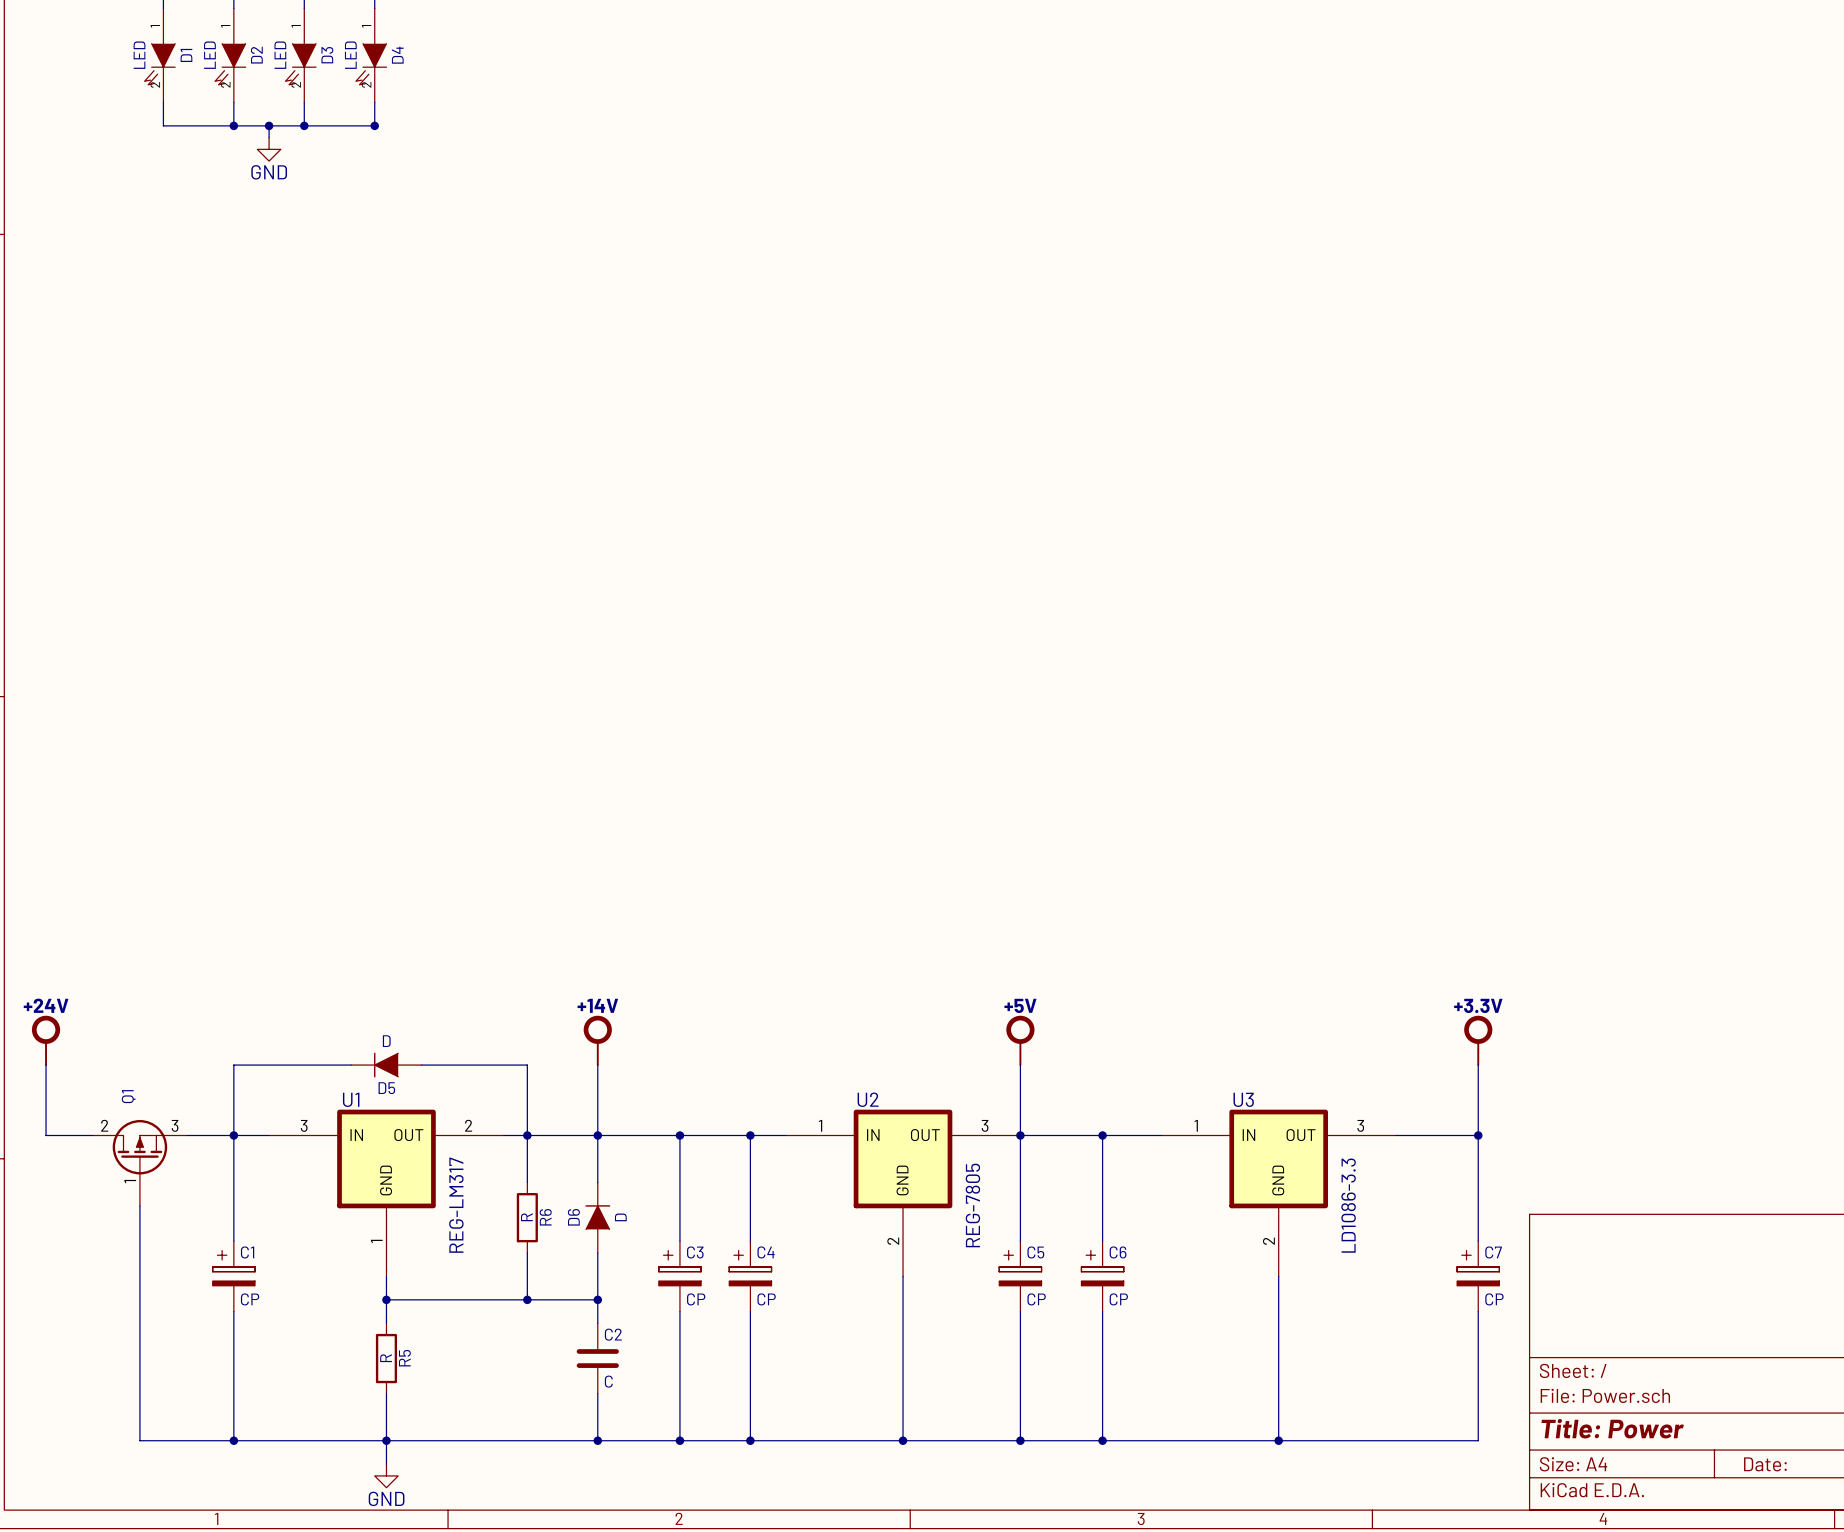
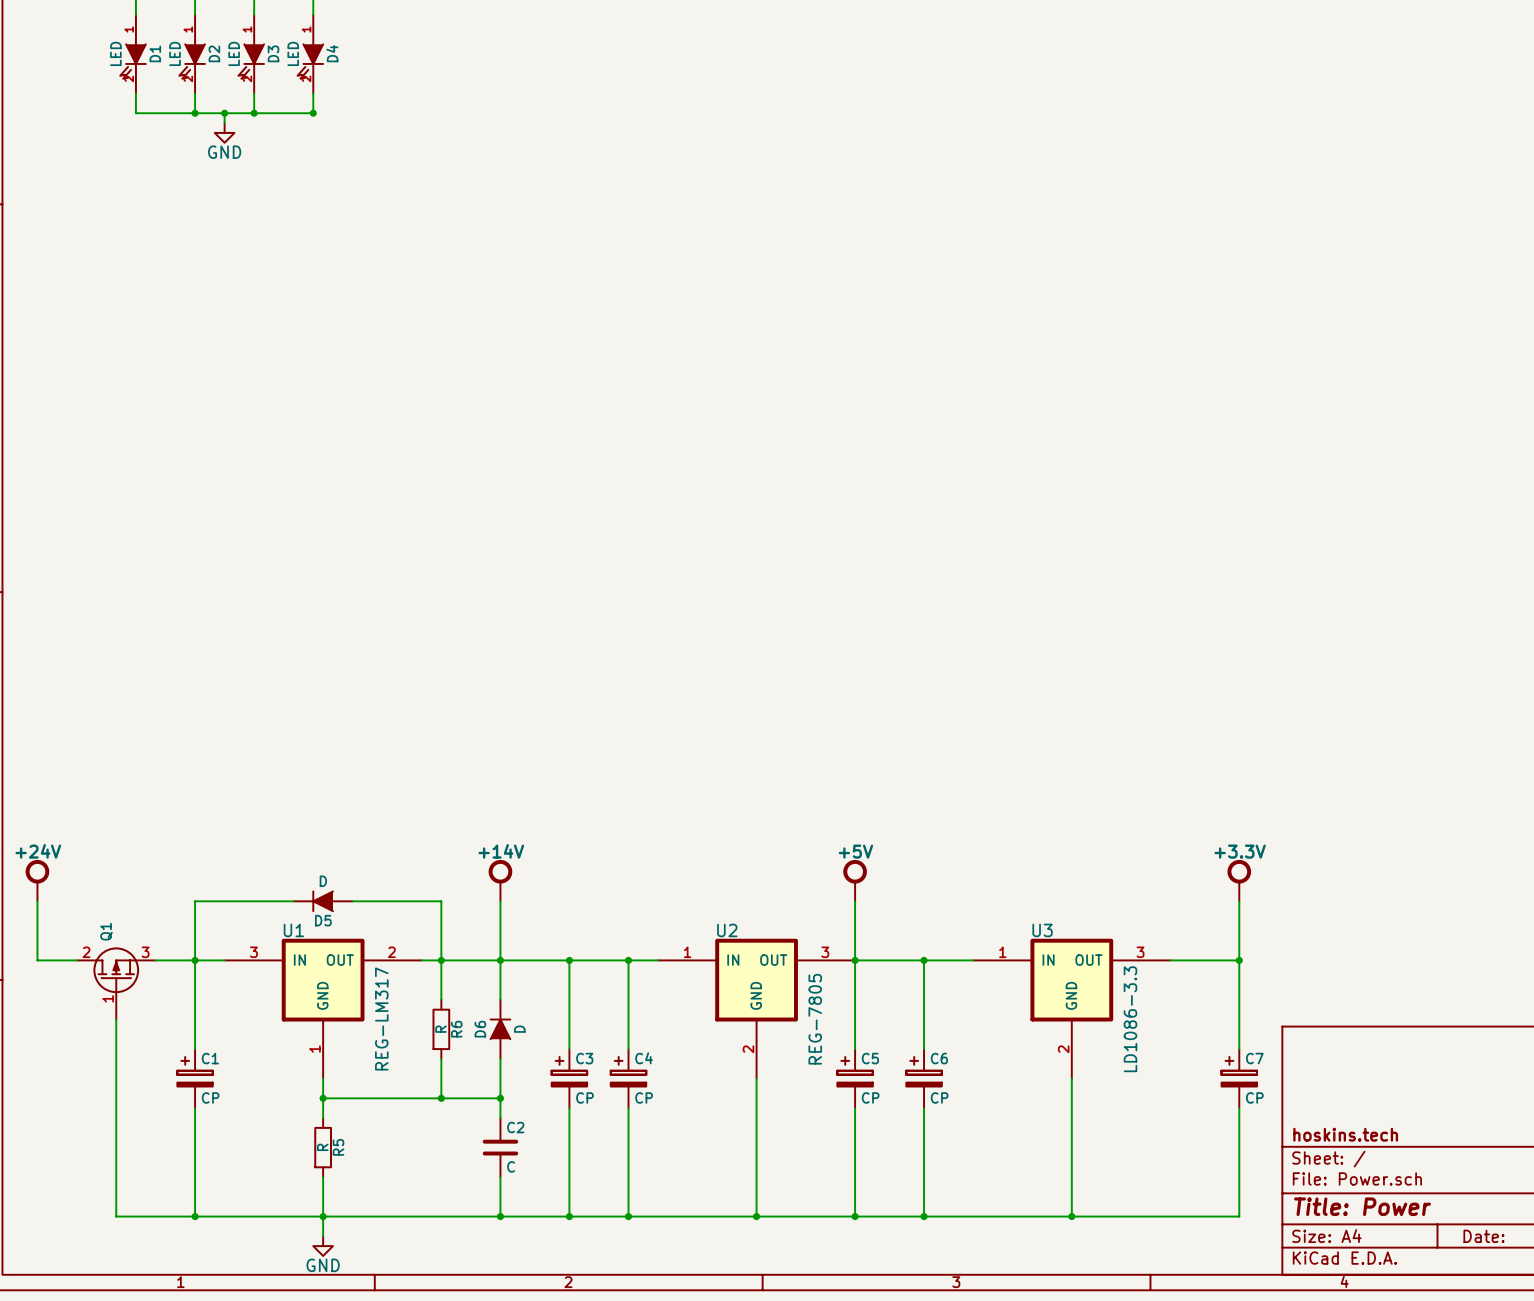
title block: none -> hoskins.tech (1345, 1134)

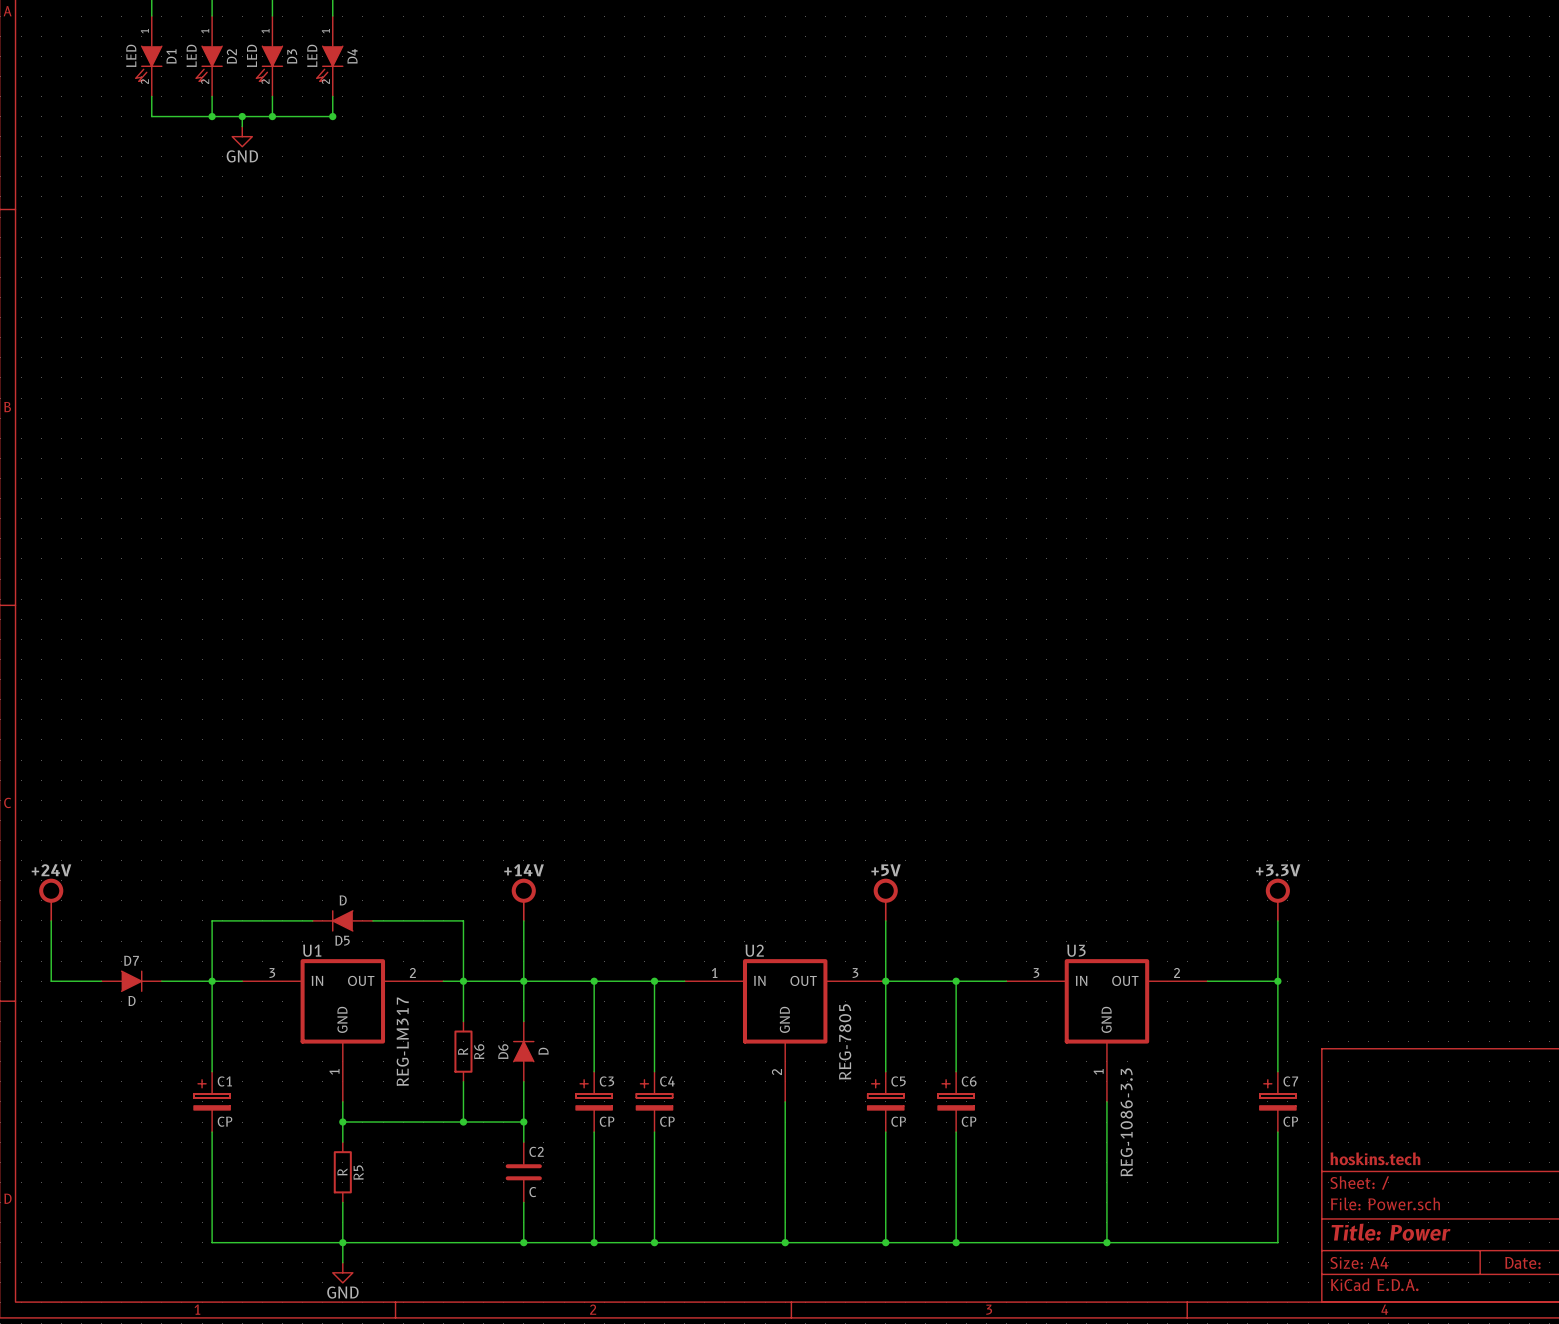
U3 pin number: 1 (1002, 952) -> 3 (1036, 973)
U3 pin number: 3 (1140, 952) -> 2 (1177, 972)
D7: none -> D (131, 981)
Q1: (116, 983) -> none
wire: (116, 1019) (116, 1216) (195, 1216) -> none
U3 value: LD1086-3.3 (1130, 1019) -> REG-1086-3.3 (1126, 1122)
U3 pin number: 2 (1063, 1049) -> 1 (1098, 1071)
junction: (195, 1216) -> none

